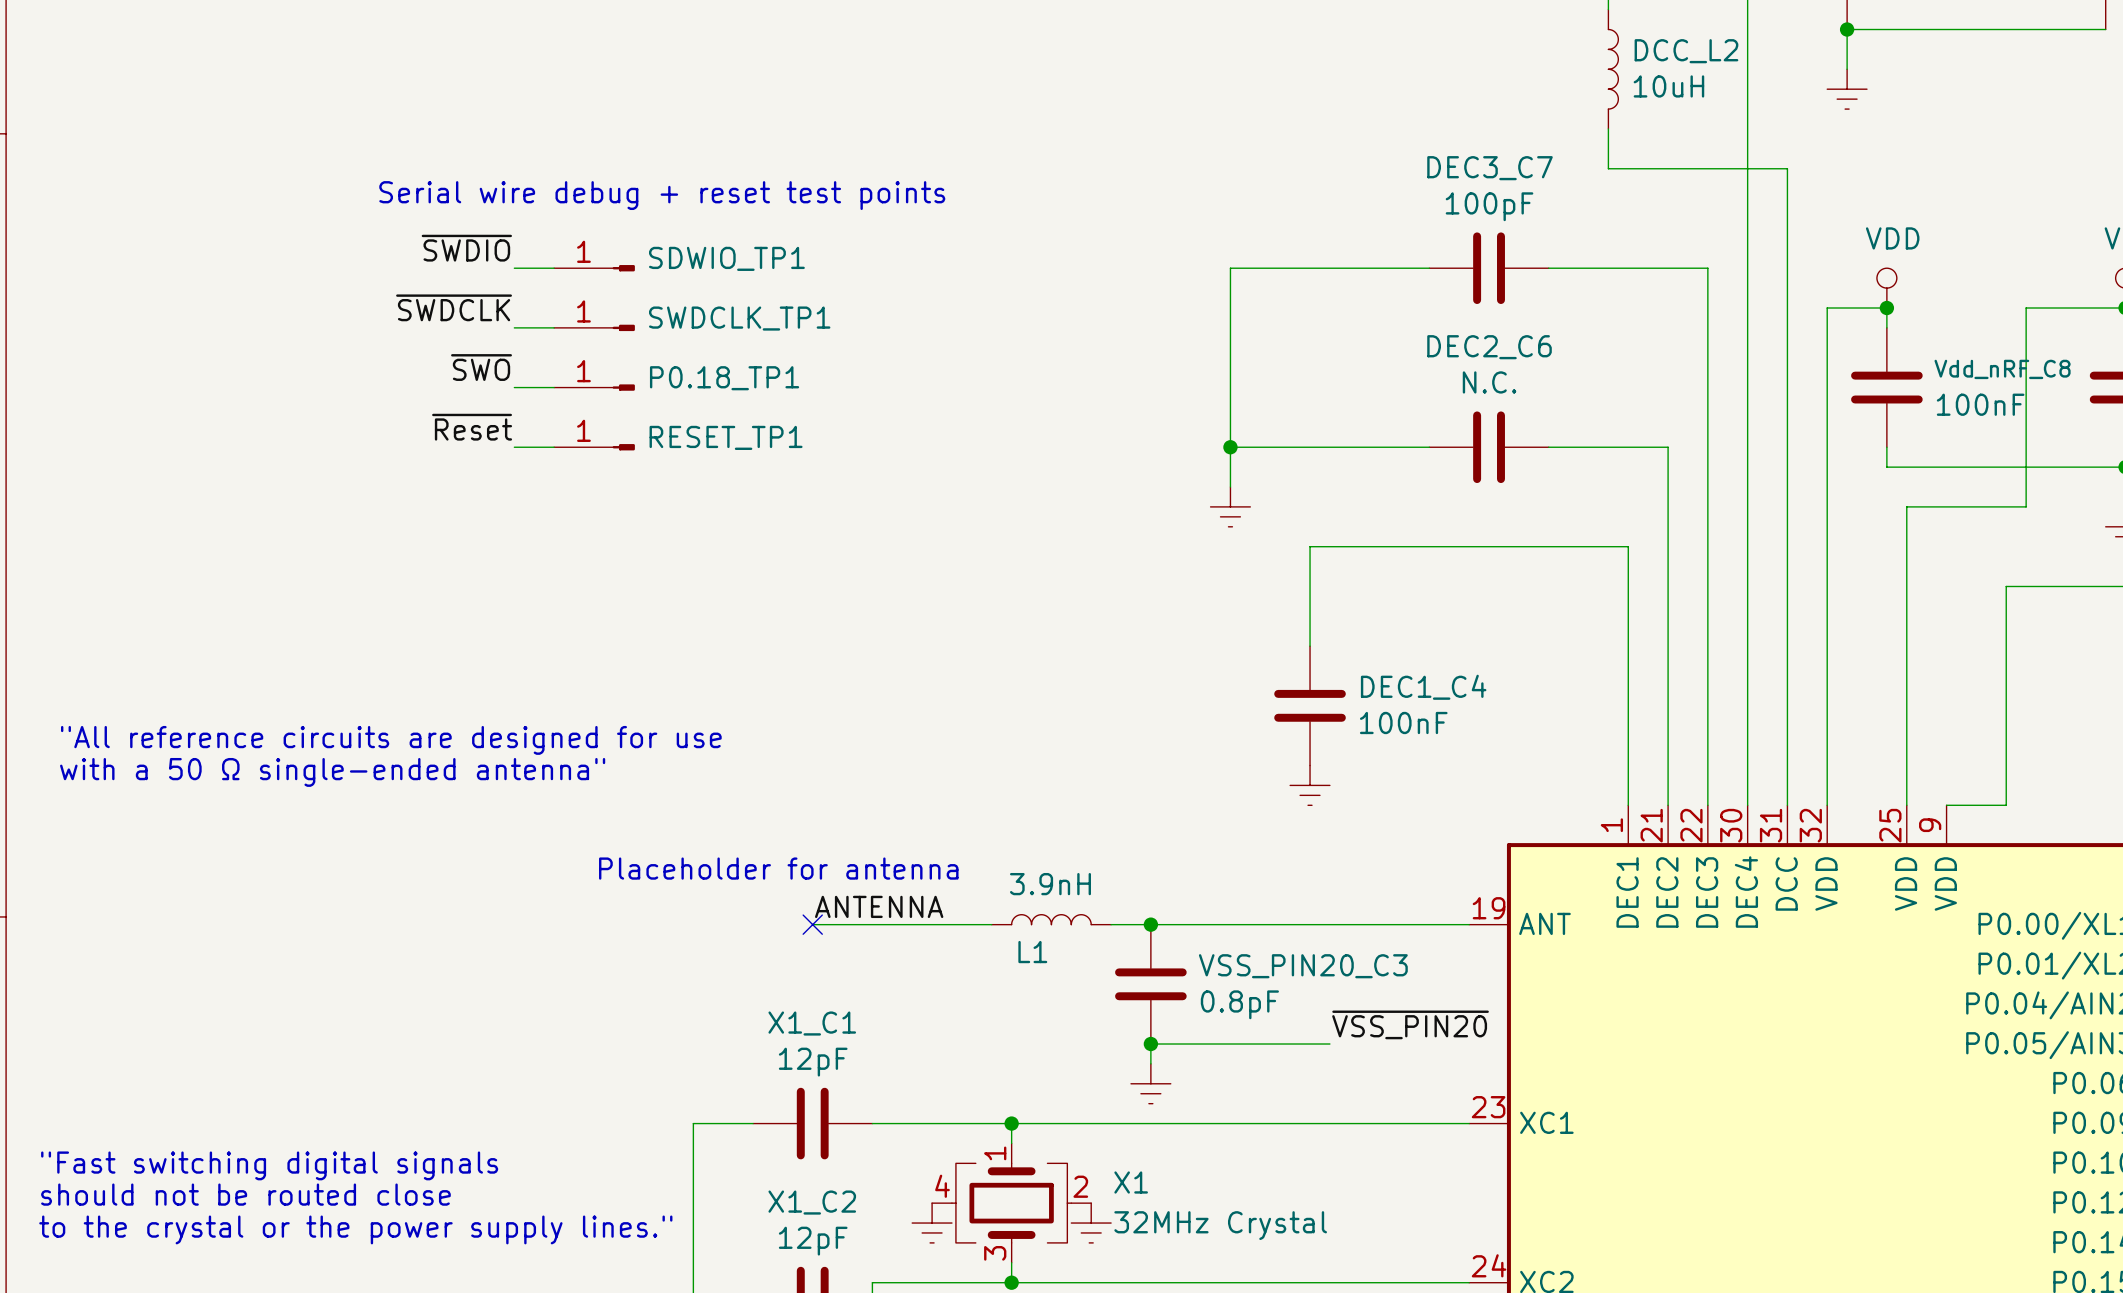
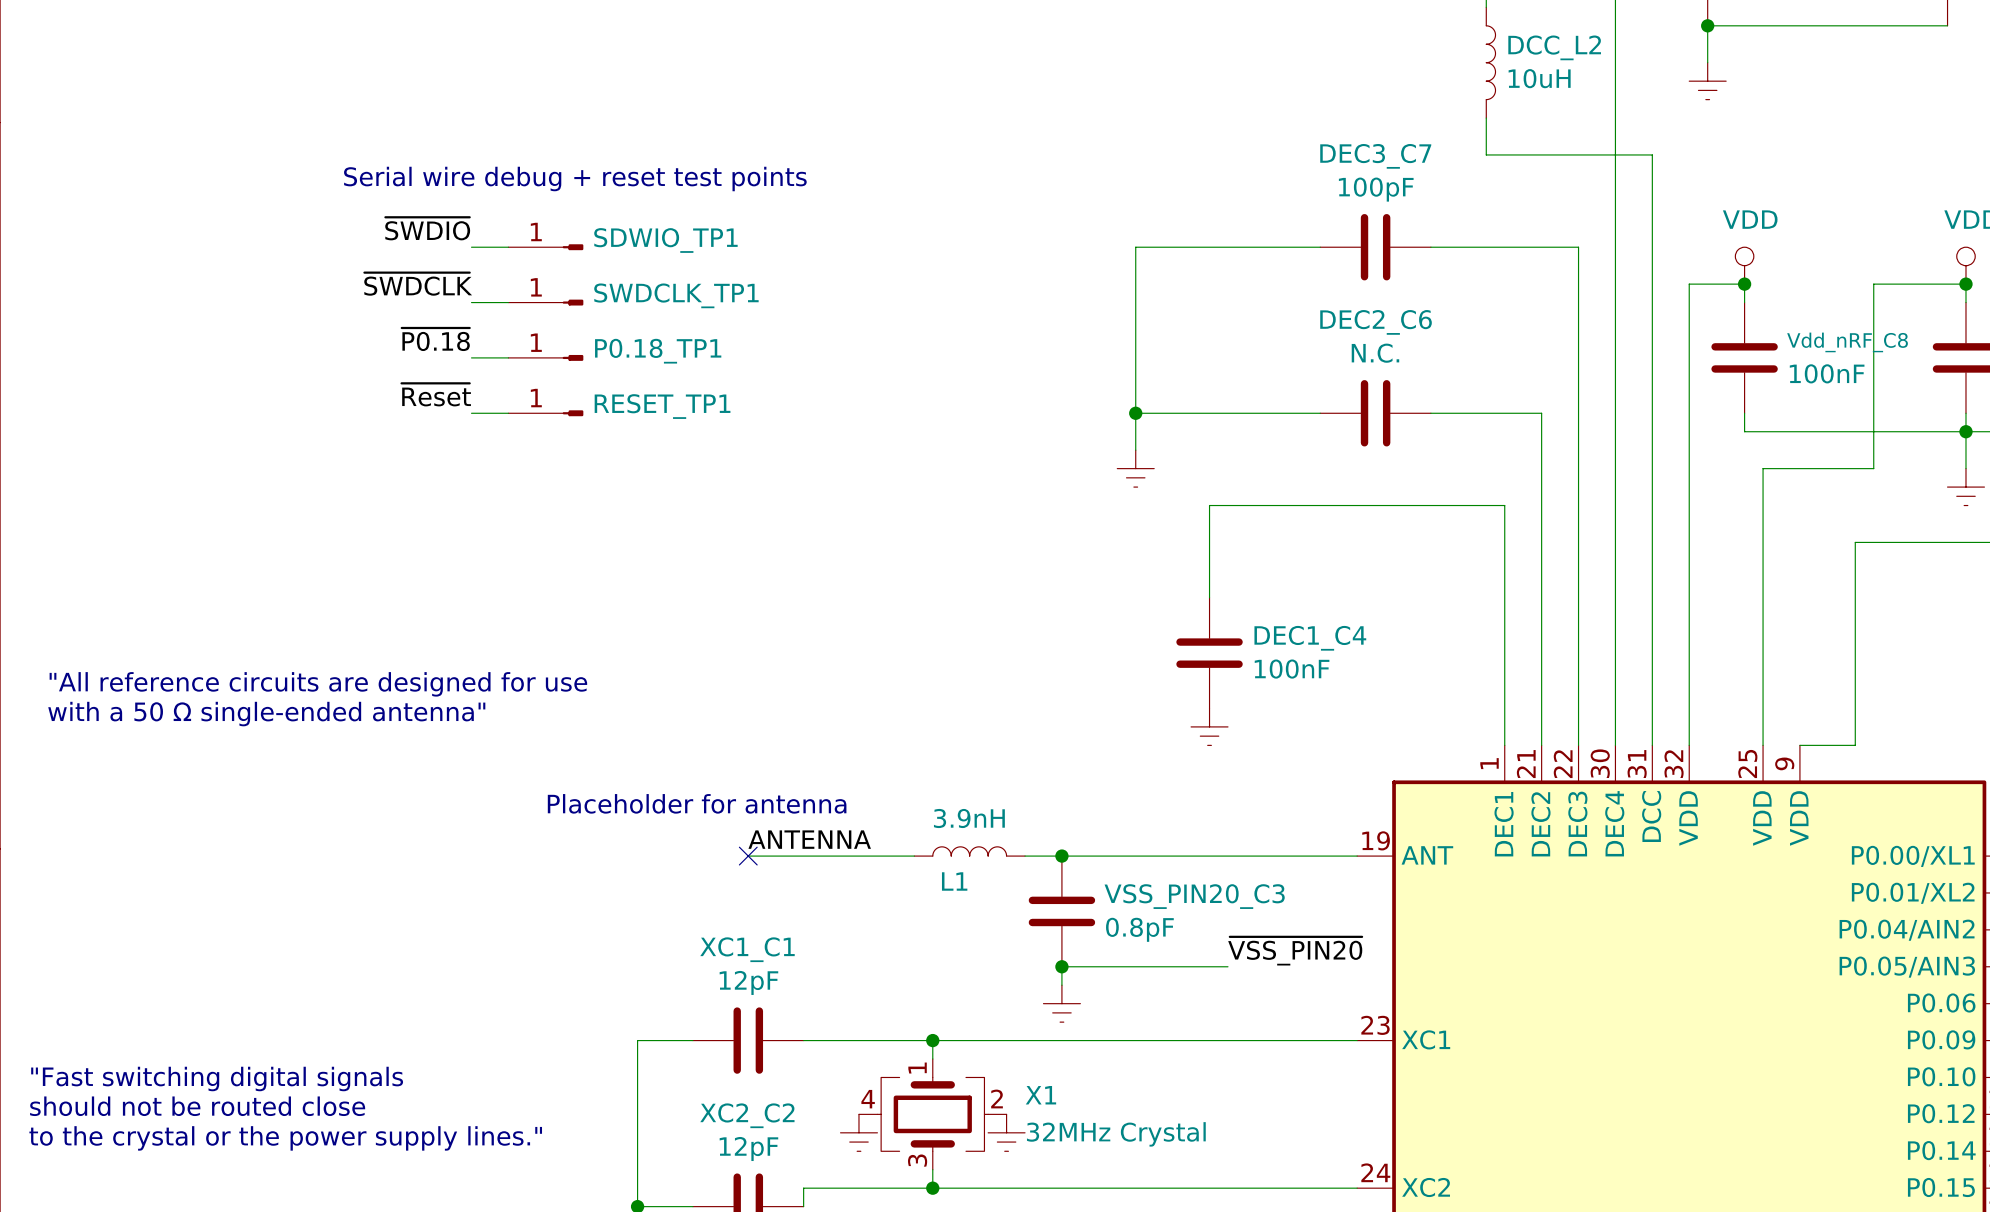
label: ~{SWO} (481, 367) -> ~{P0.18} (435, 339)
X1_C1 name: X1_C1 (812, 1023) -> XC1_C1 (747, 949)
X1_C2 name: X1_C2 (812, 1202) -> XC2_C2 (747, 1115)

